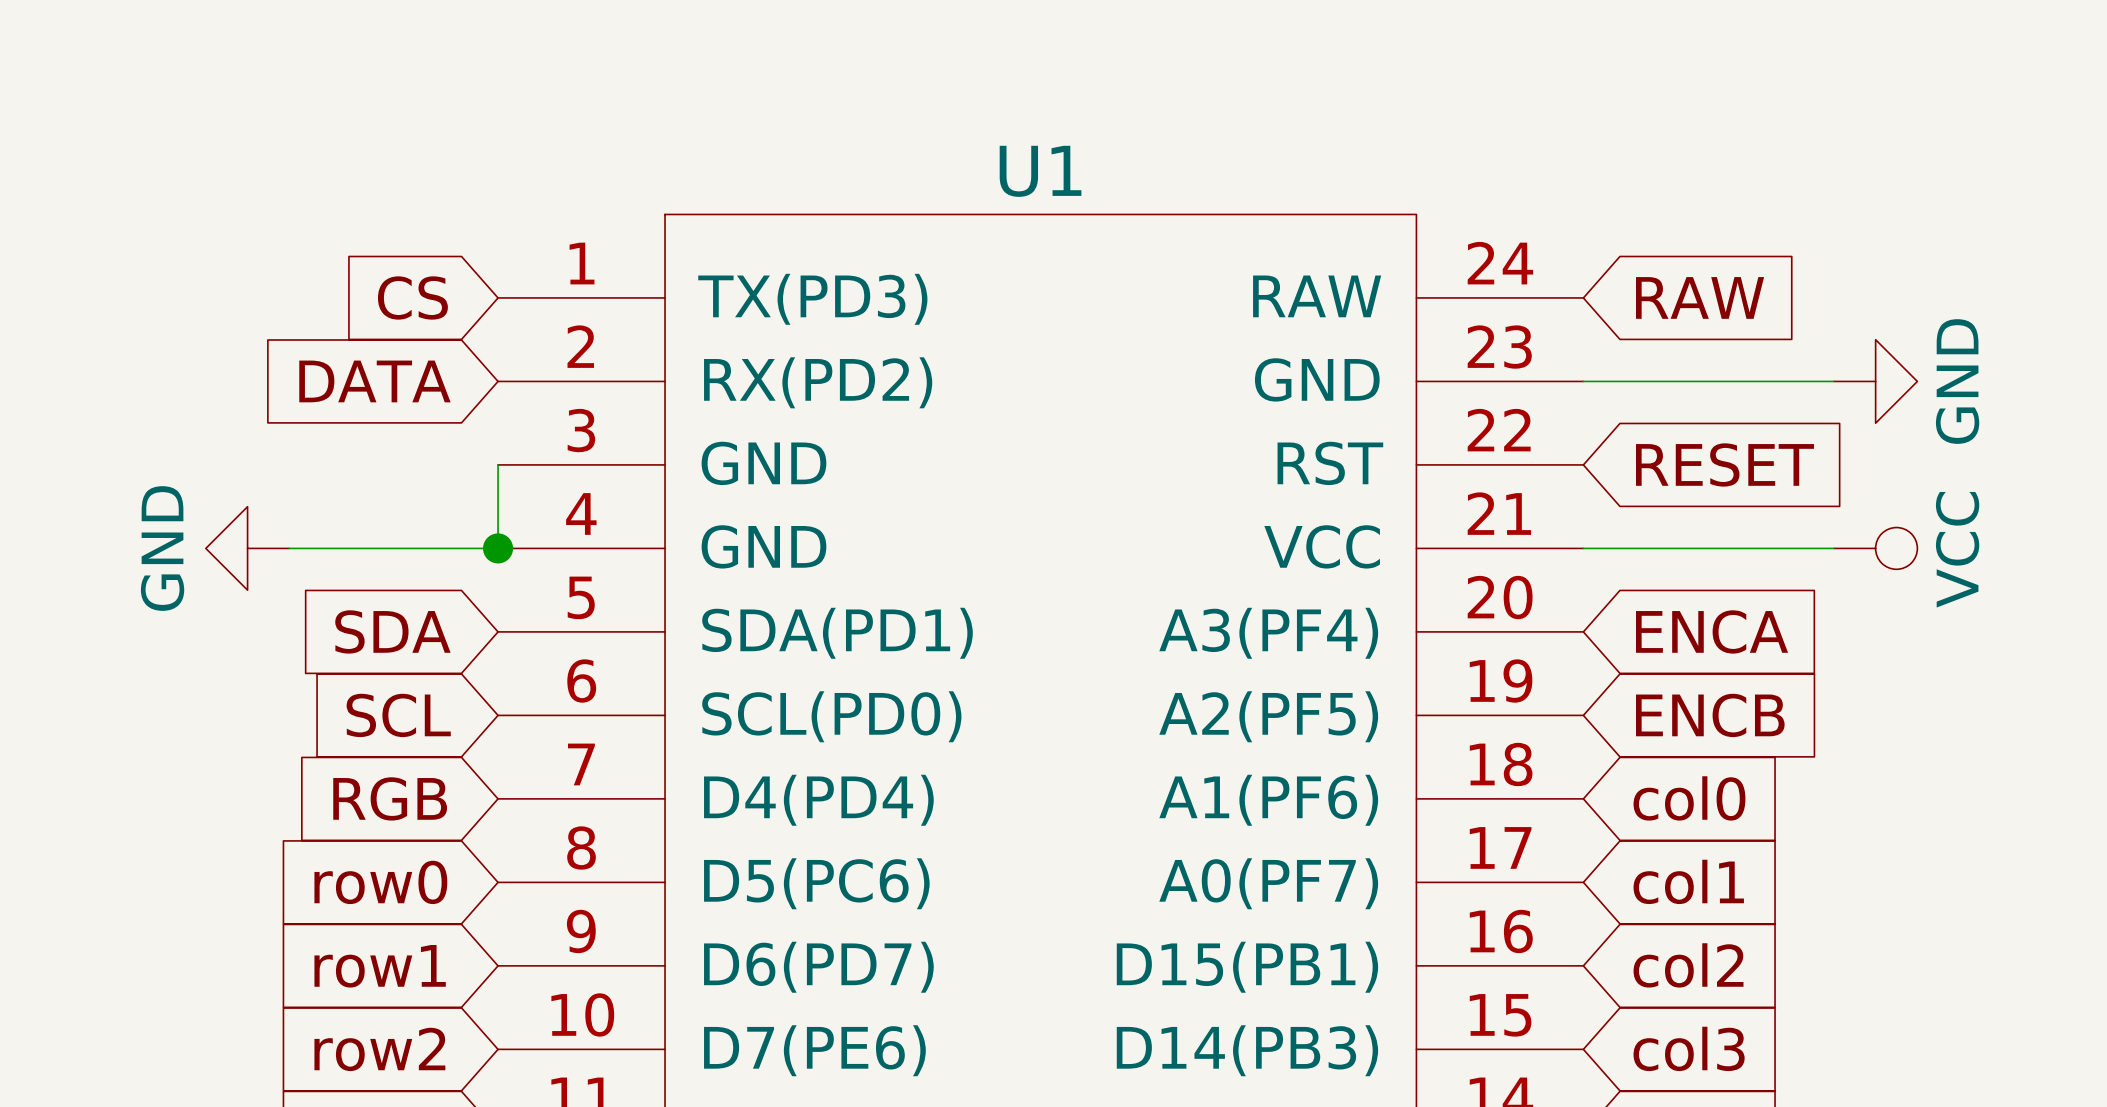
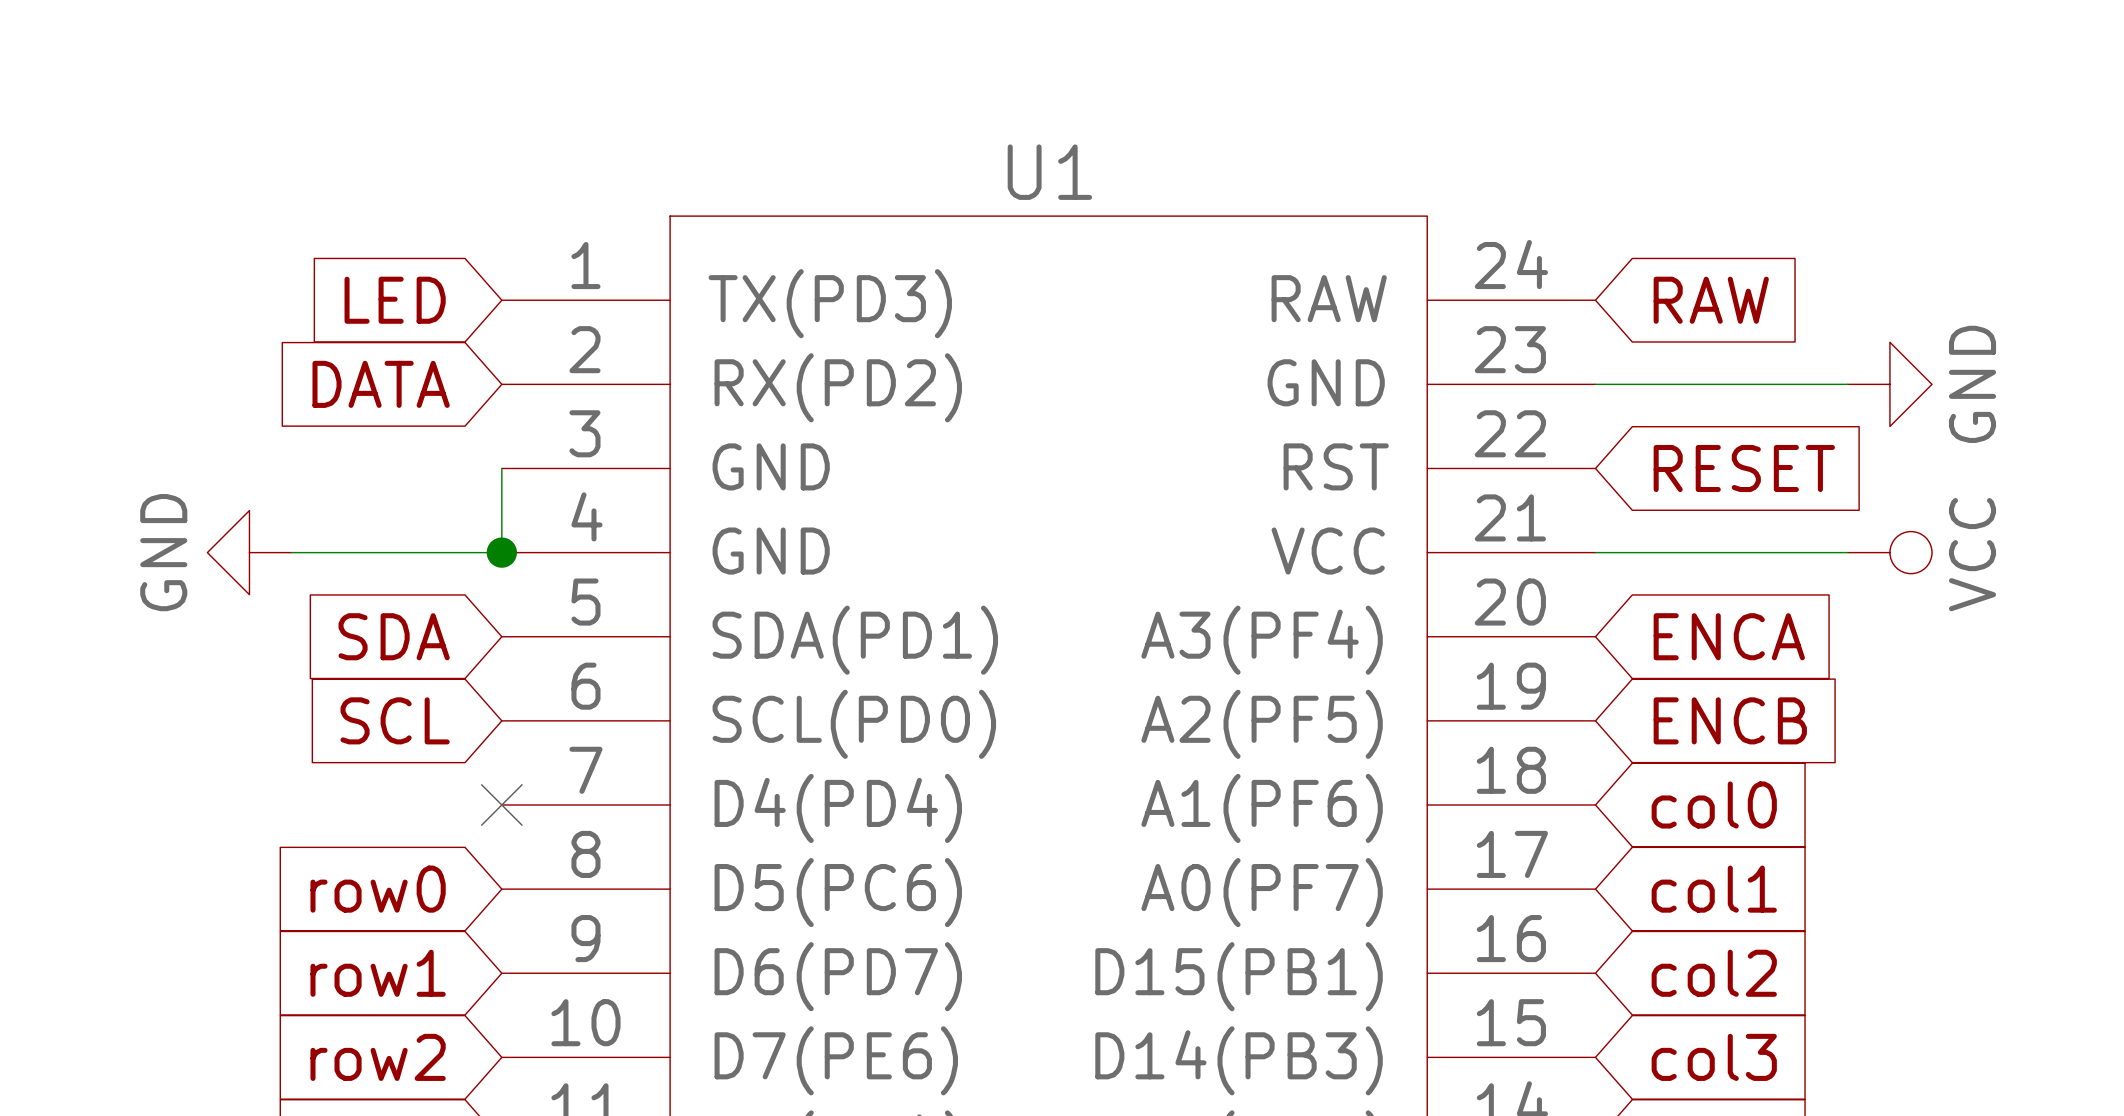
global label: CS (412, 297) -> LED (395, 300)
global label: RGB (390, 798) -> none
no-connect mark: none -> (501, 805)

